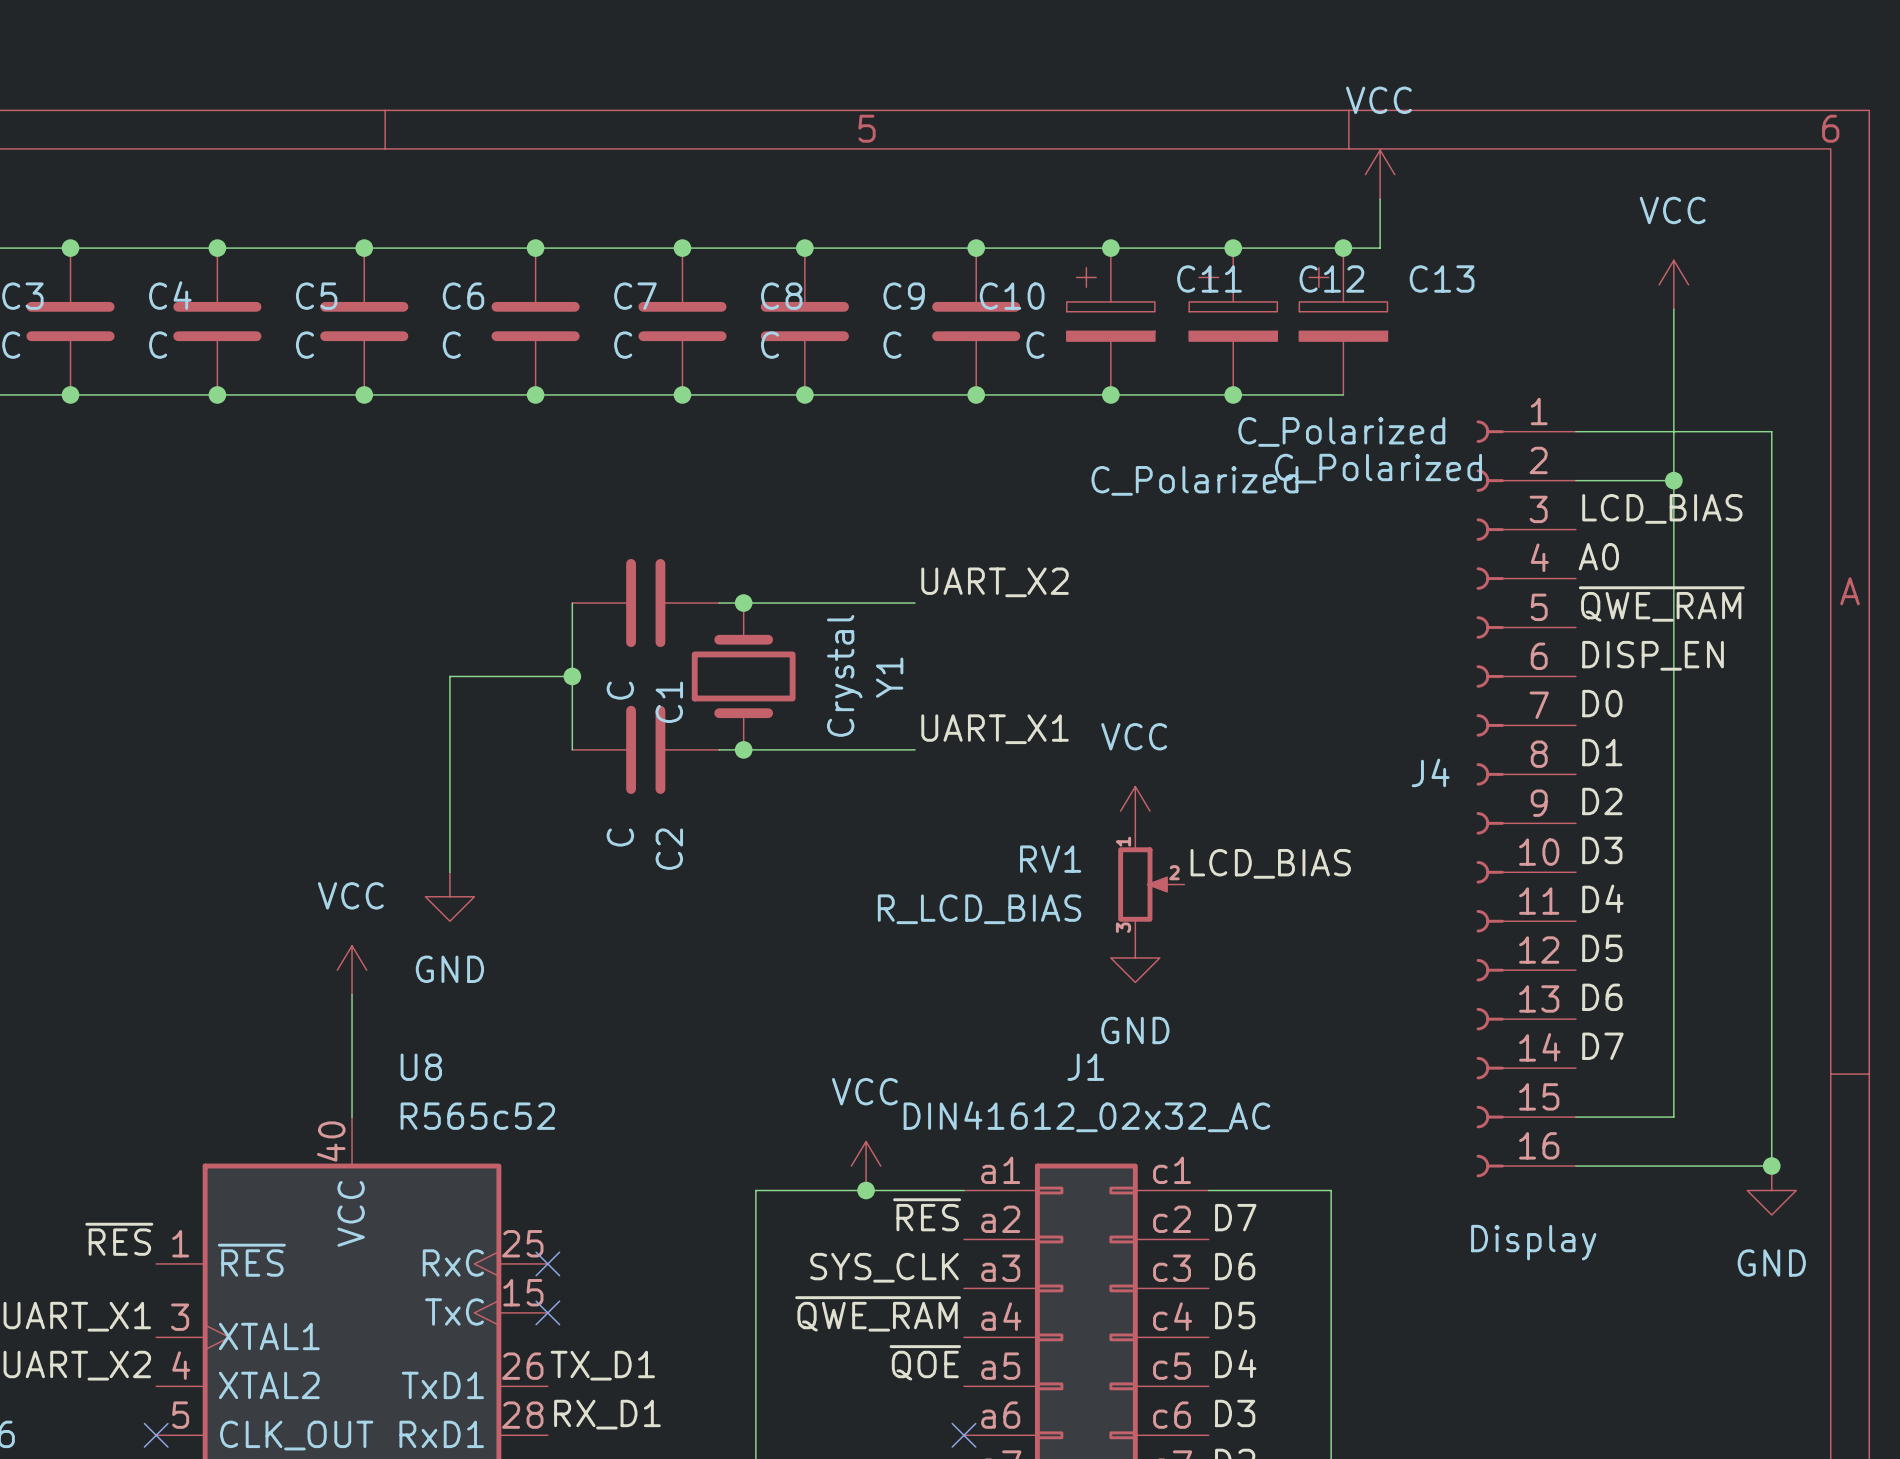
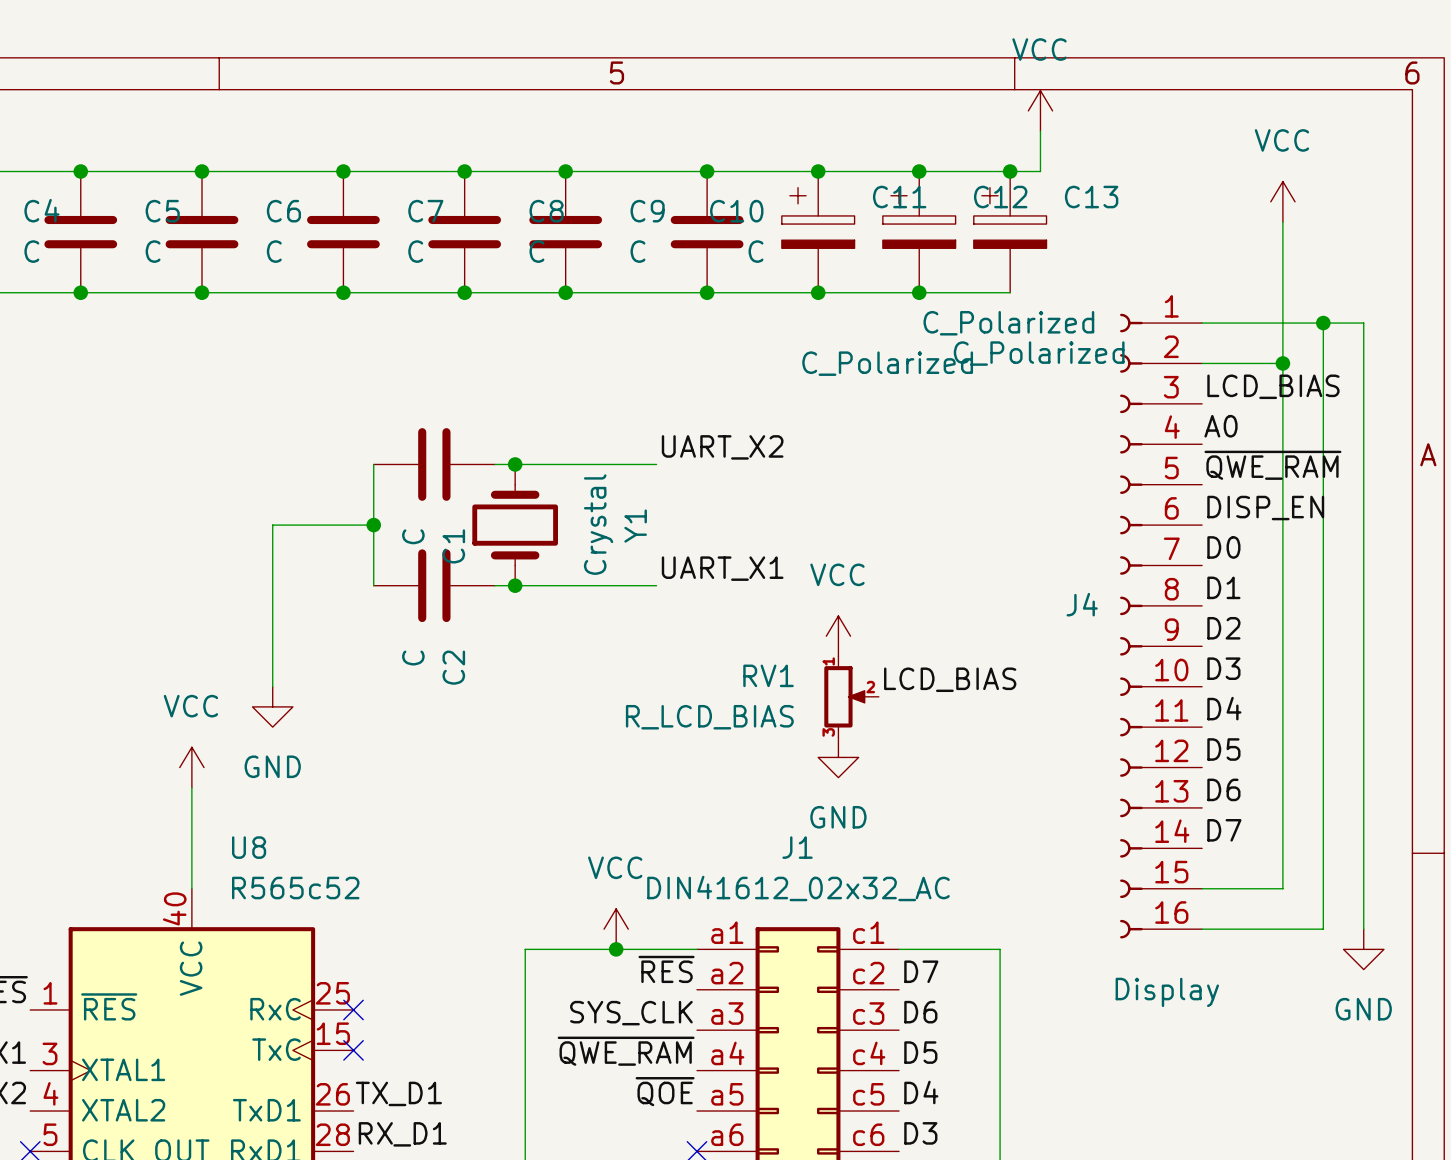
junction: none -> (1323, 323)
wire: (1722, 1166) (1771, 1166) -> (1323, 929) (1323, 323)
junction: (1771, 1166) -> none

